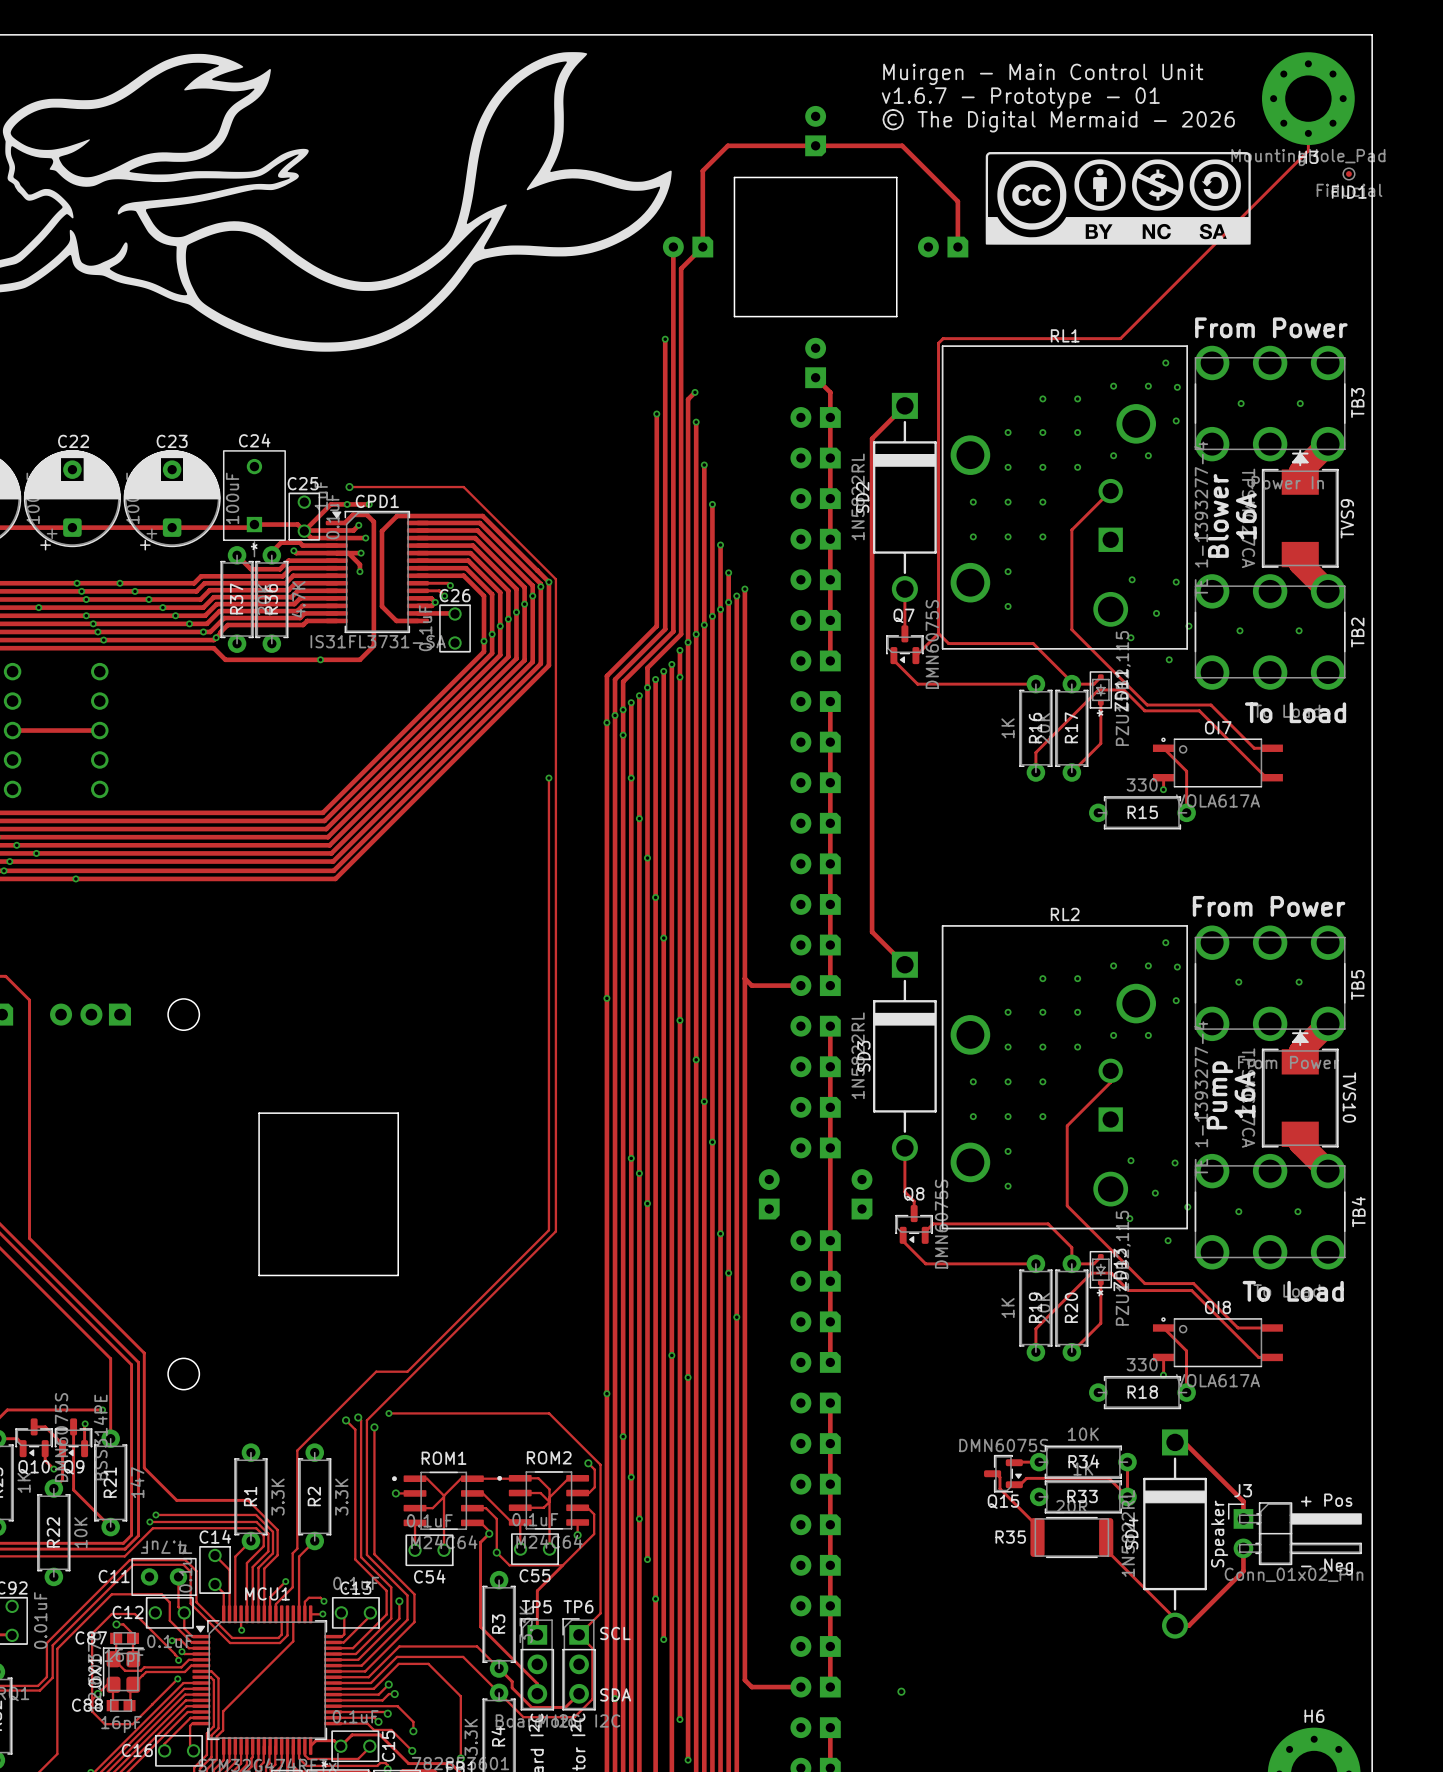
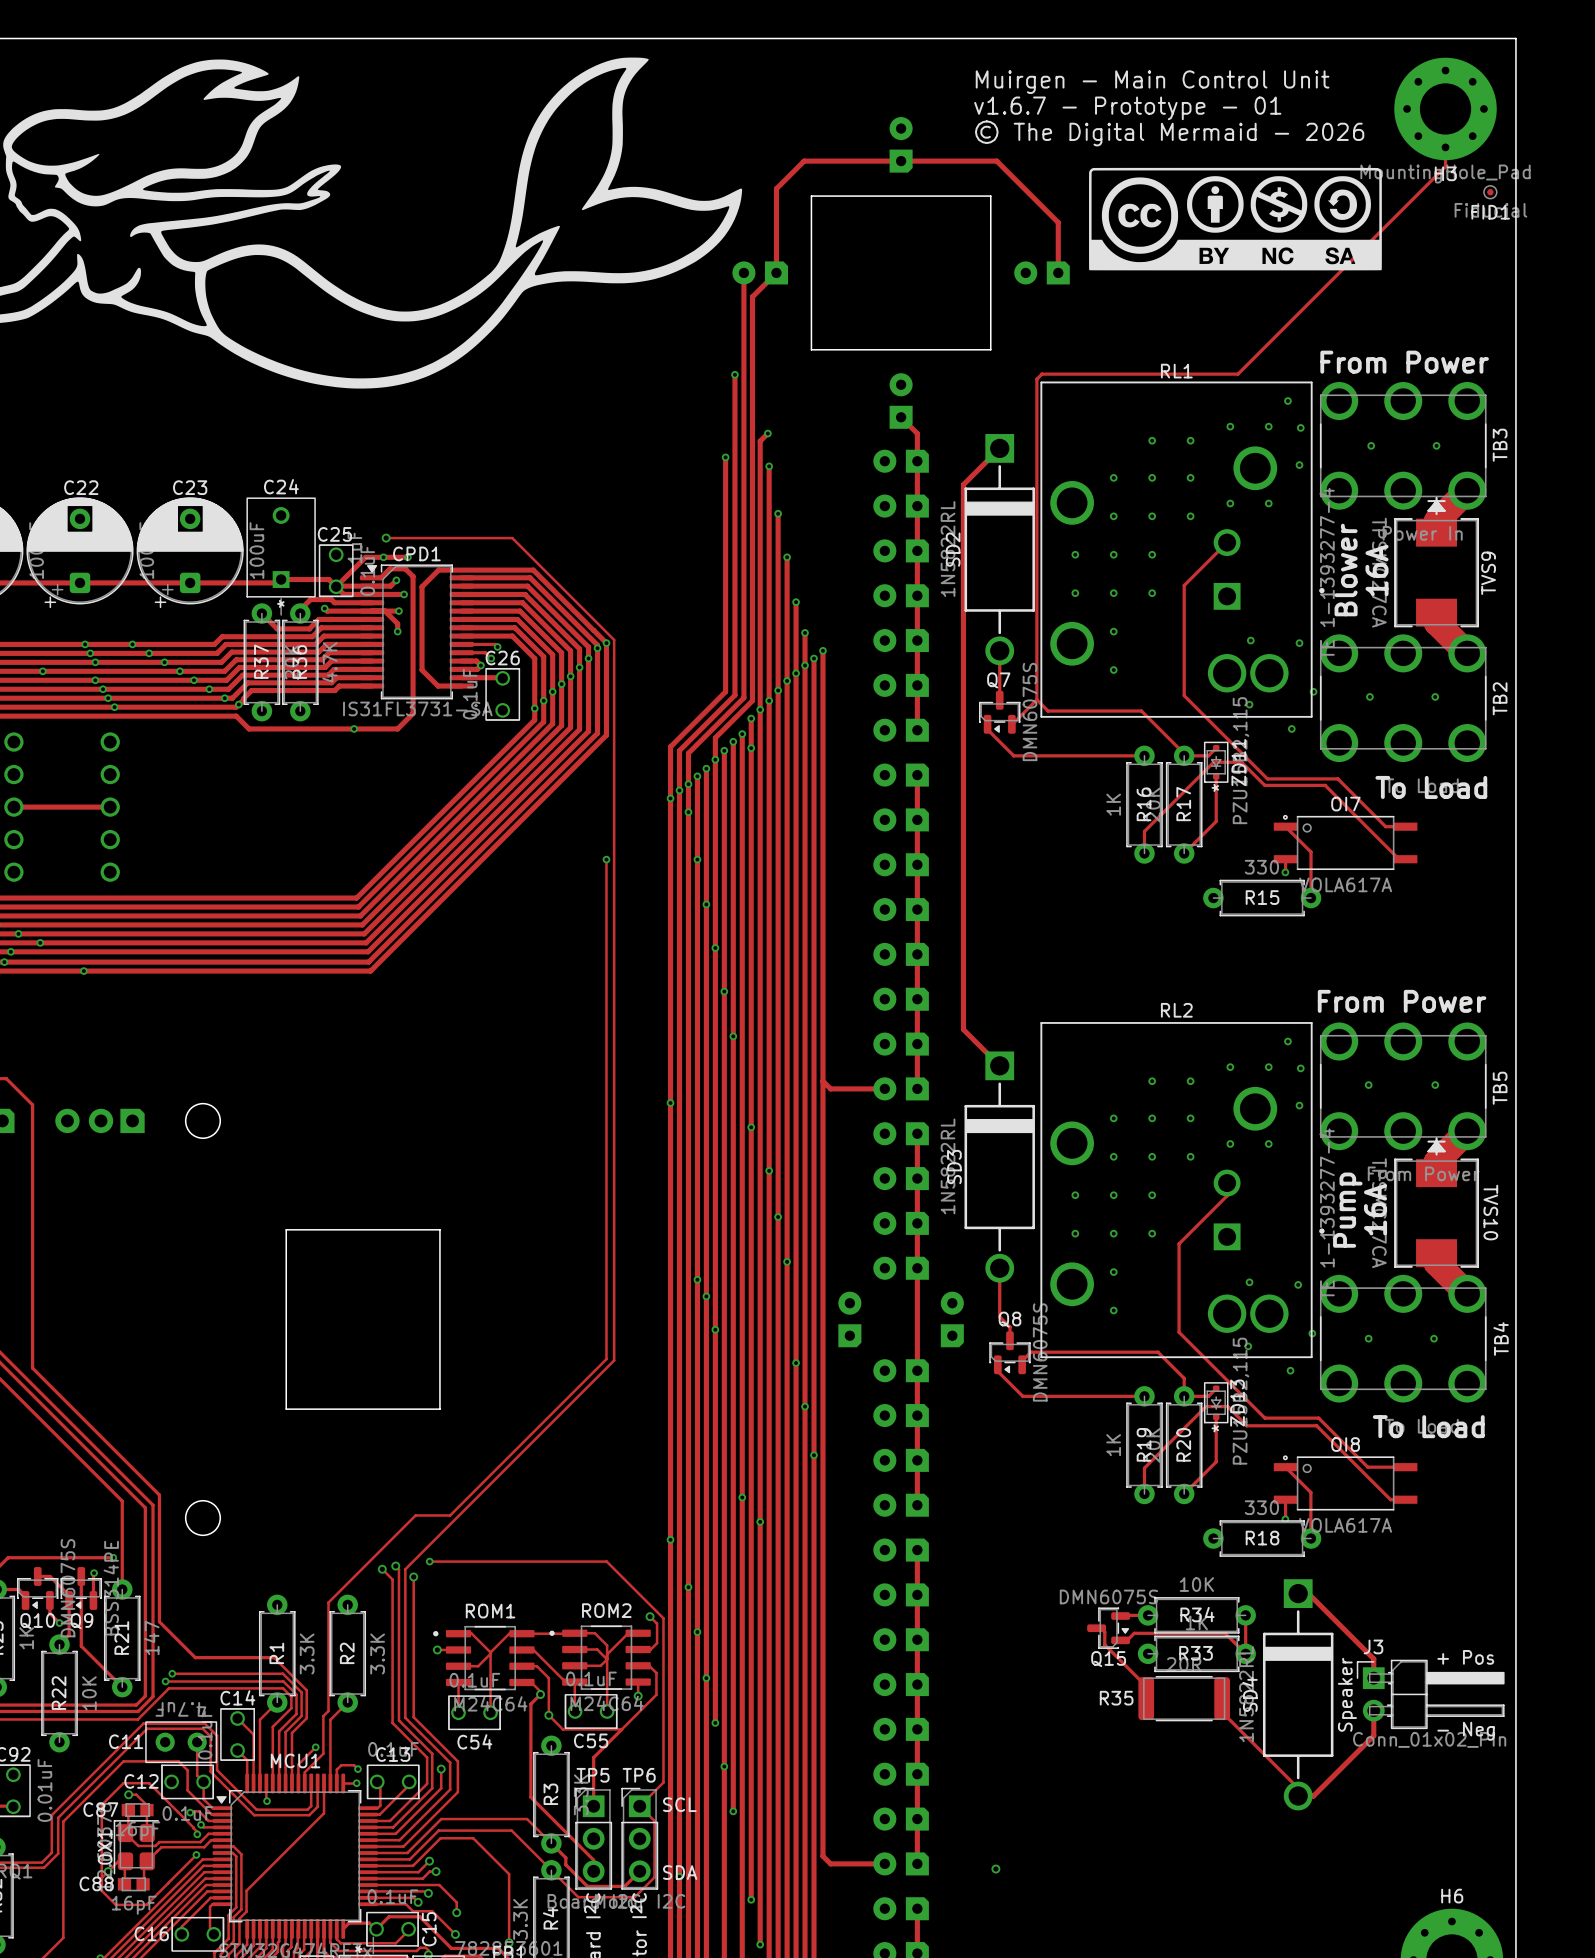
RL1 footprint: [941, 345, 1199, 650] -> [1040, 381, 1325, 718]
via: (1156, 613) -> none
RL2 footprint: [941, 925, 1199, 1230] -> [1040, 1022, 1325, 1359]
via: (1155, 1193) -> none

